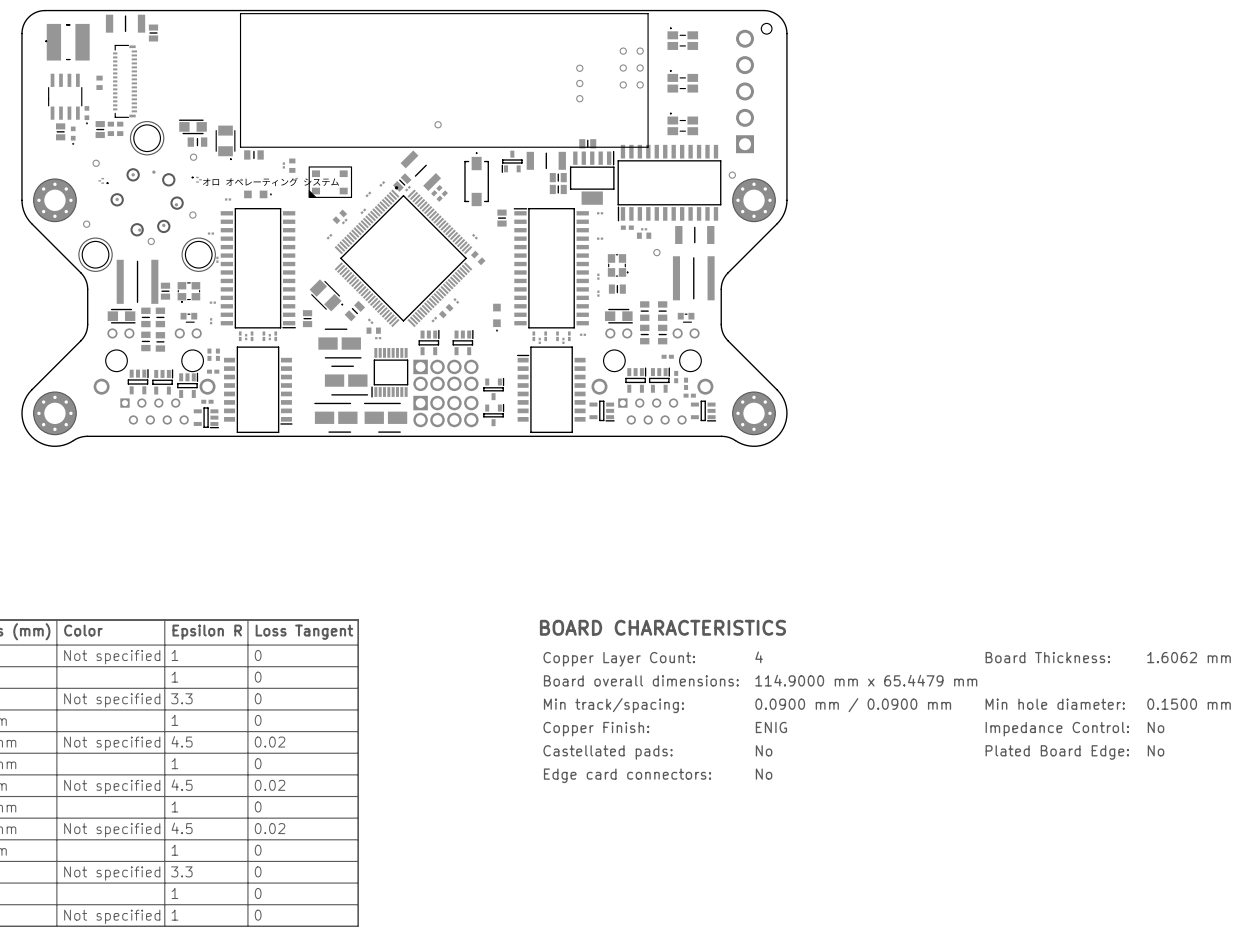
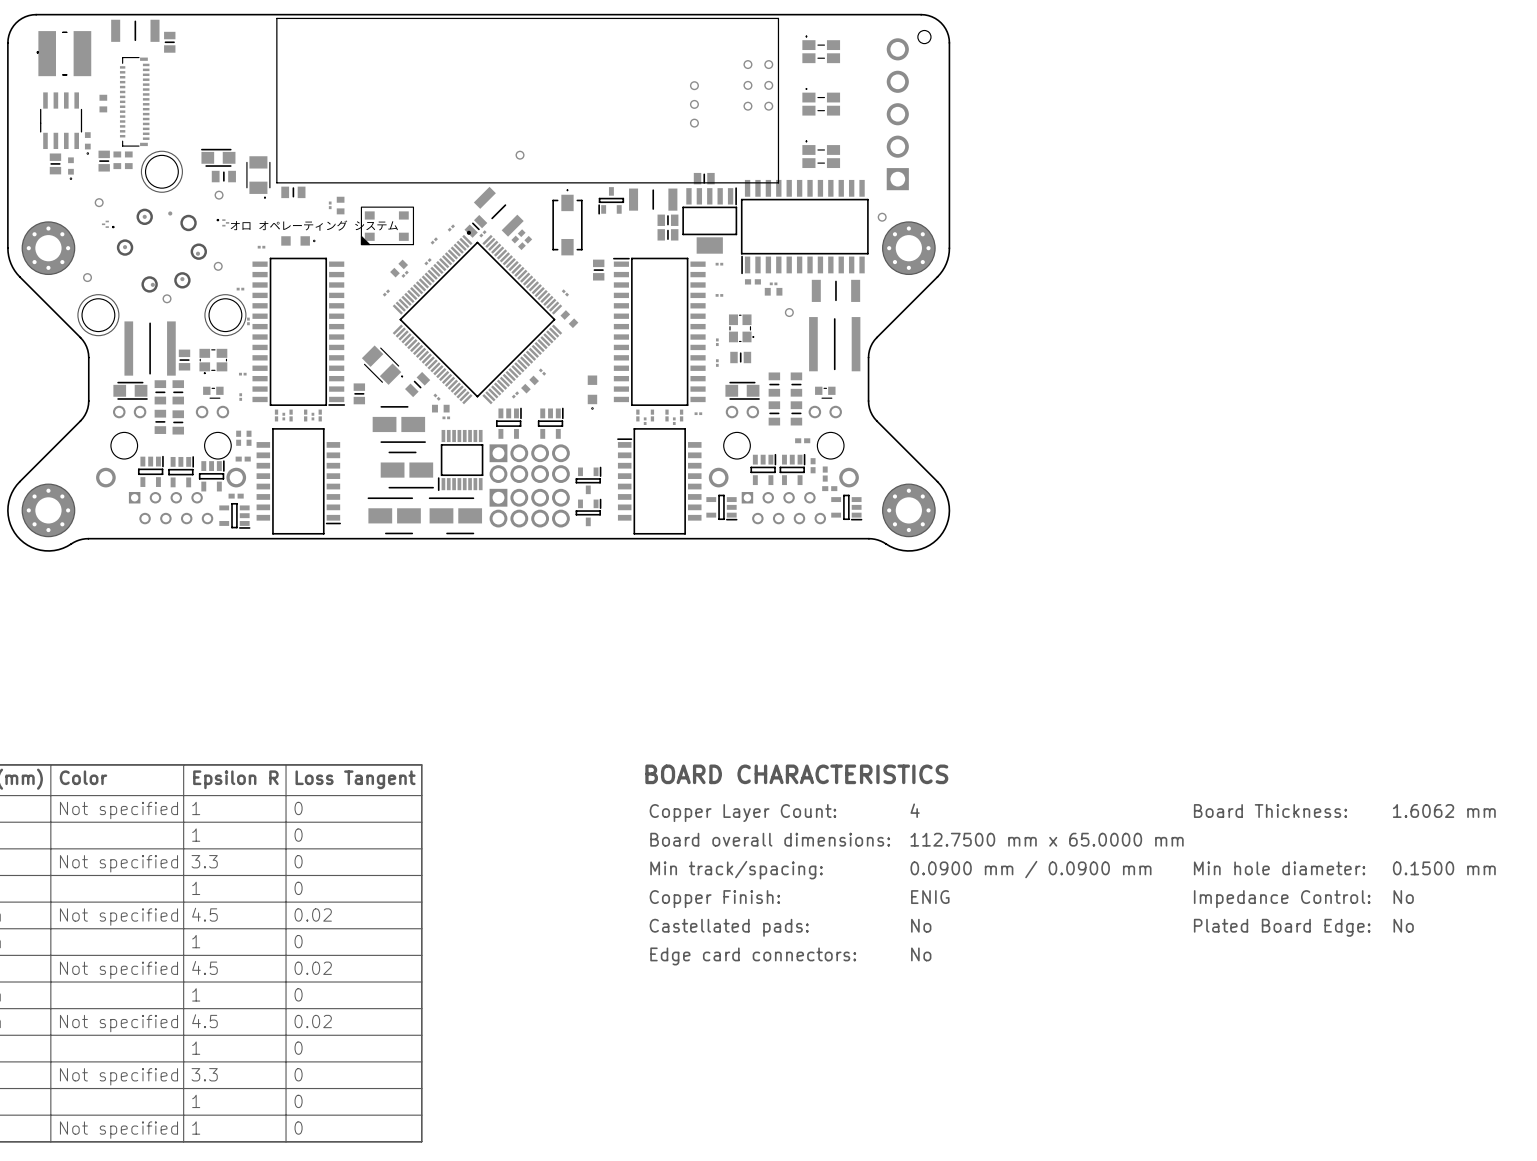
text: 114.9000 mm x 65.4479 mm (866, 680) -> 112.7500 mm x 65.0000 mm (1047, 839)

